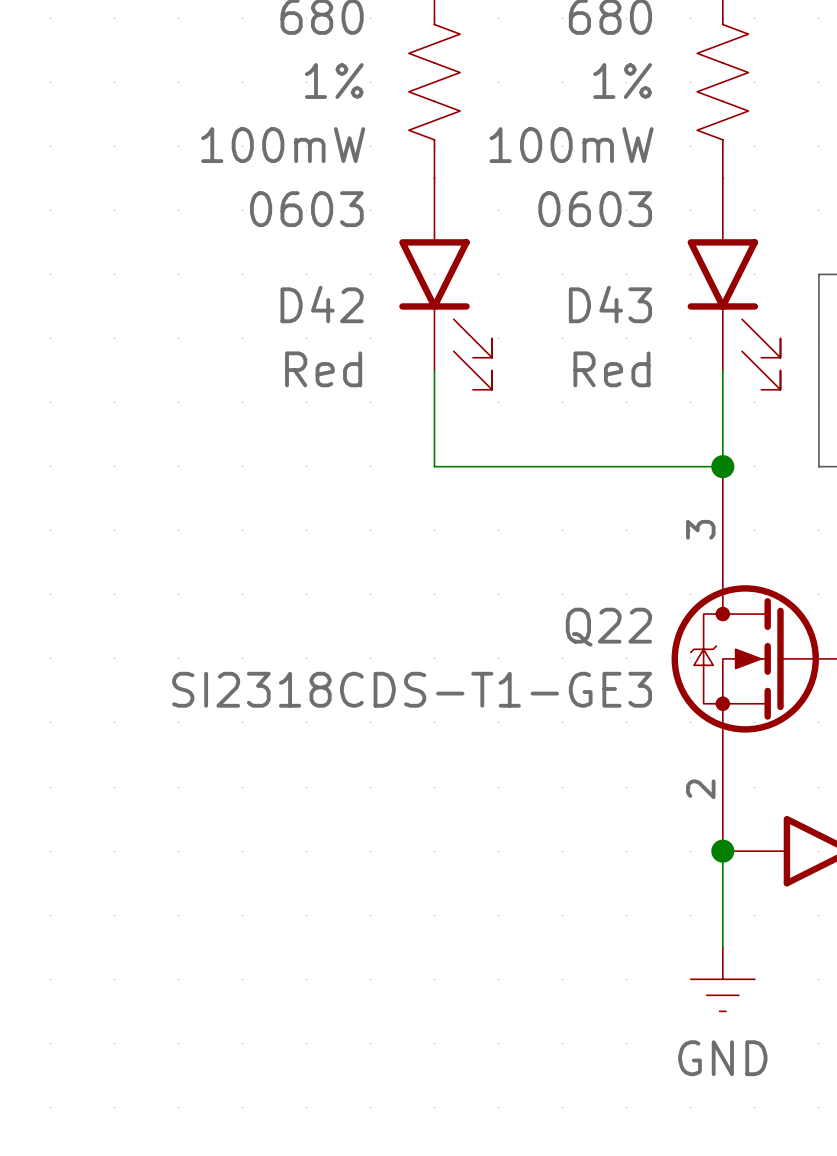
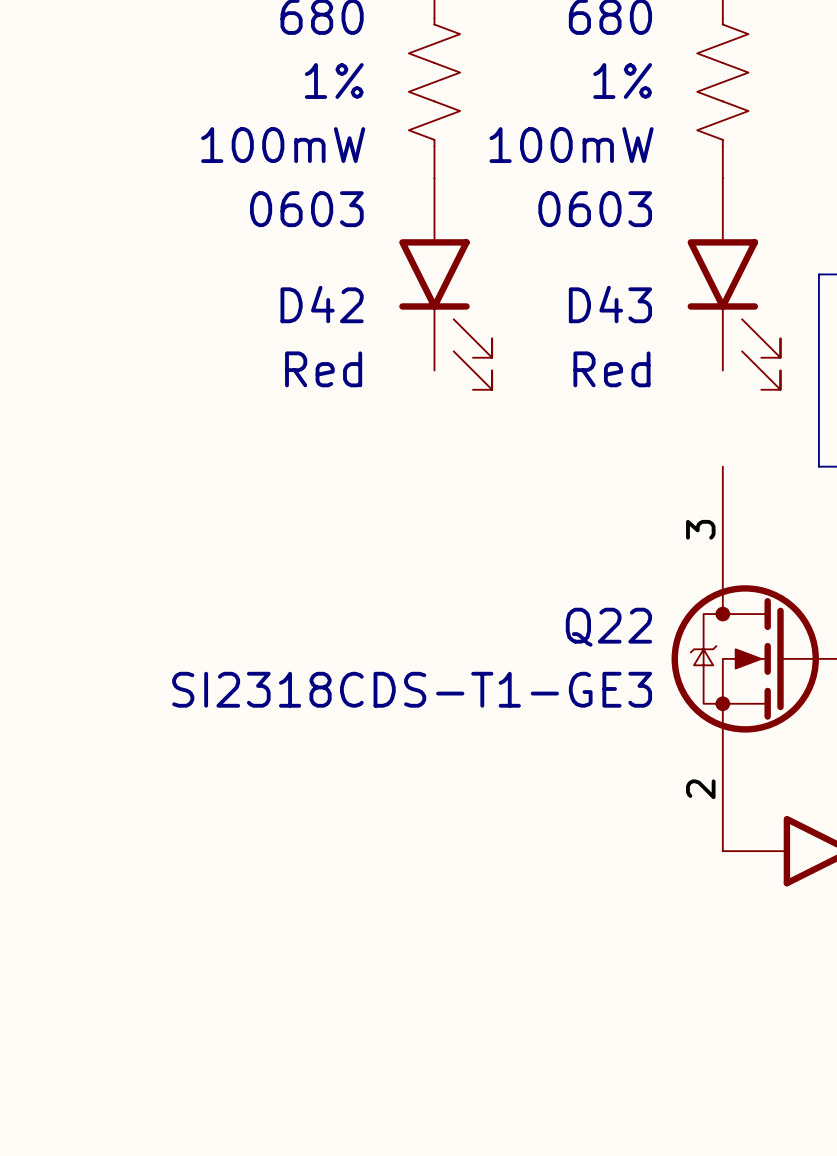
wire: (434, 370) (434, 466) (722, 466) (722, 370) -> none
junction: (722, 466) -> none
wire: (722, 851) (722, 947) -> none
junction: (722, 851) -> none
power symbol: GND (722, 979) -> none

